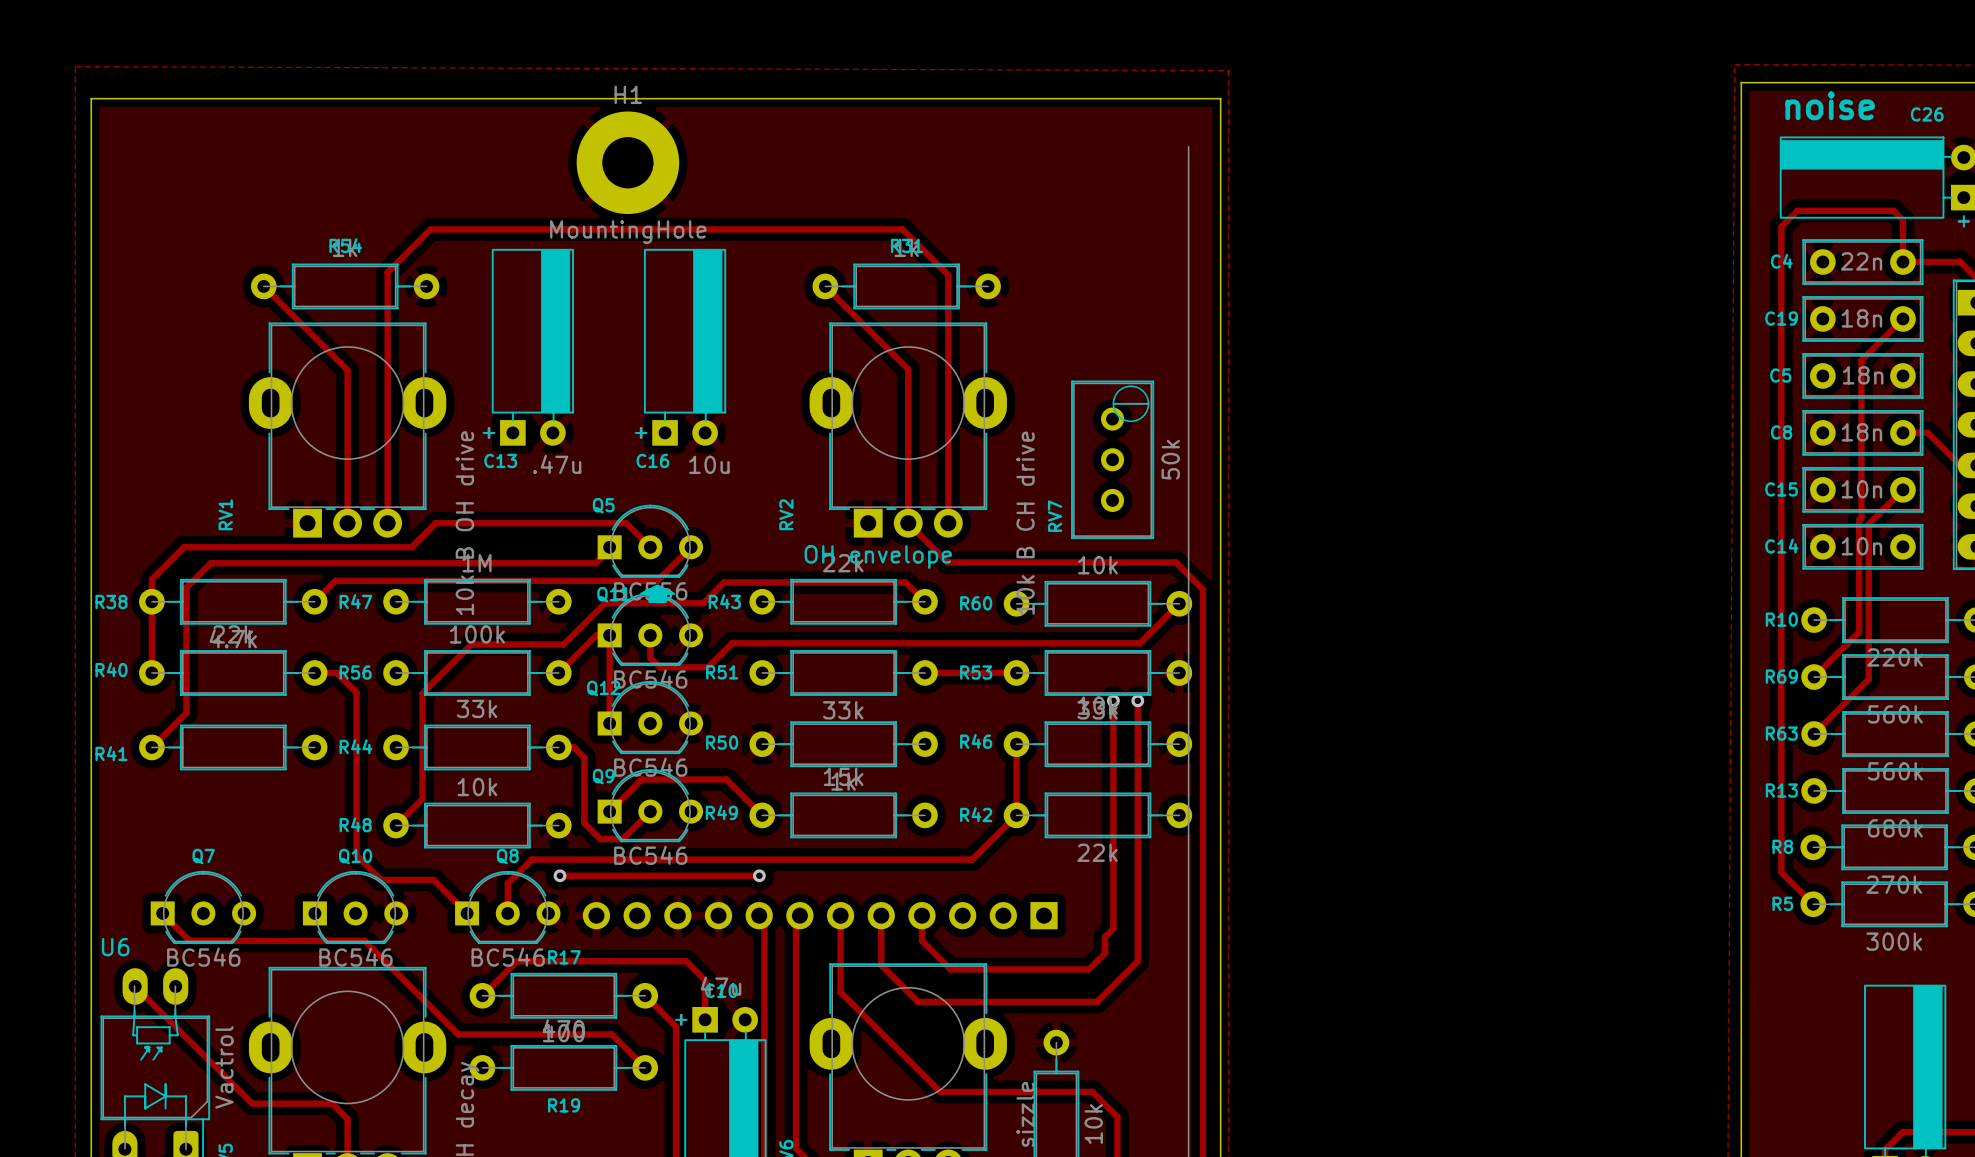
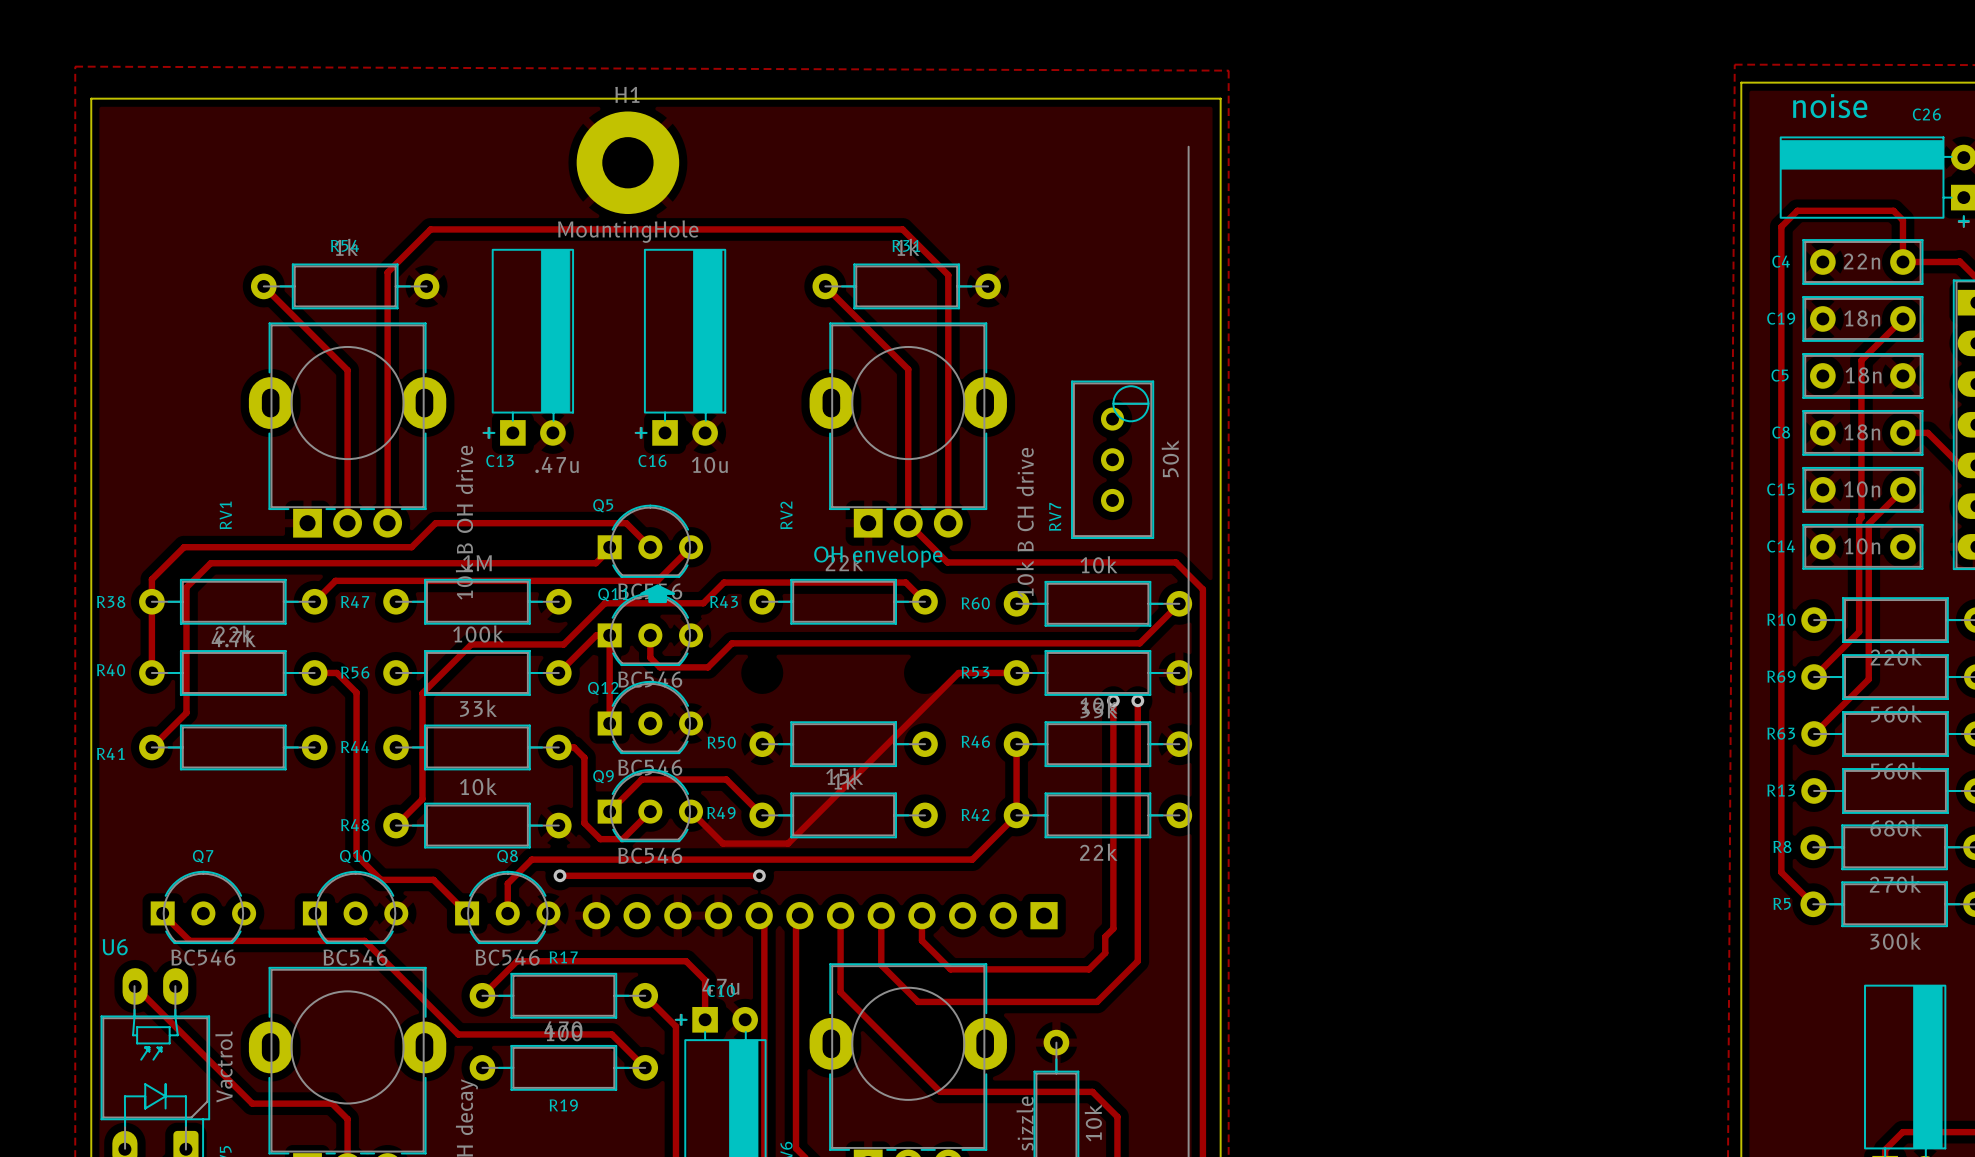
R51: 33k (843, 672) -> none
track: (925, 672) (958, 672) -> (691, 811) (723, 843) (788, 843) (958, 672)

